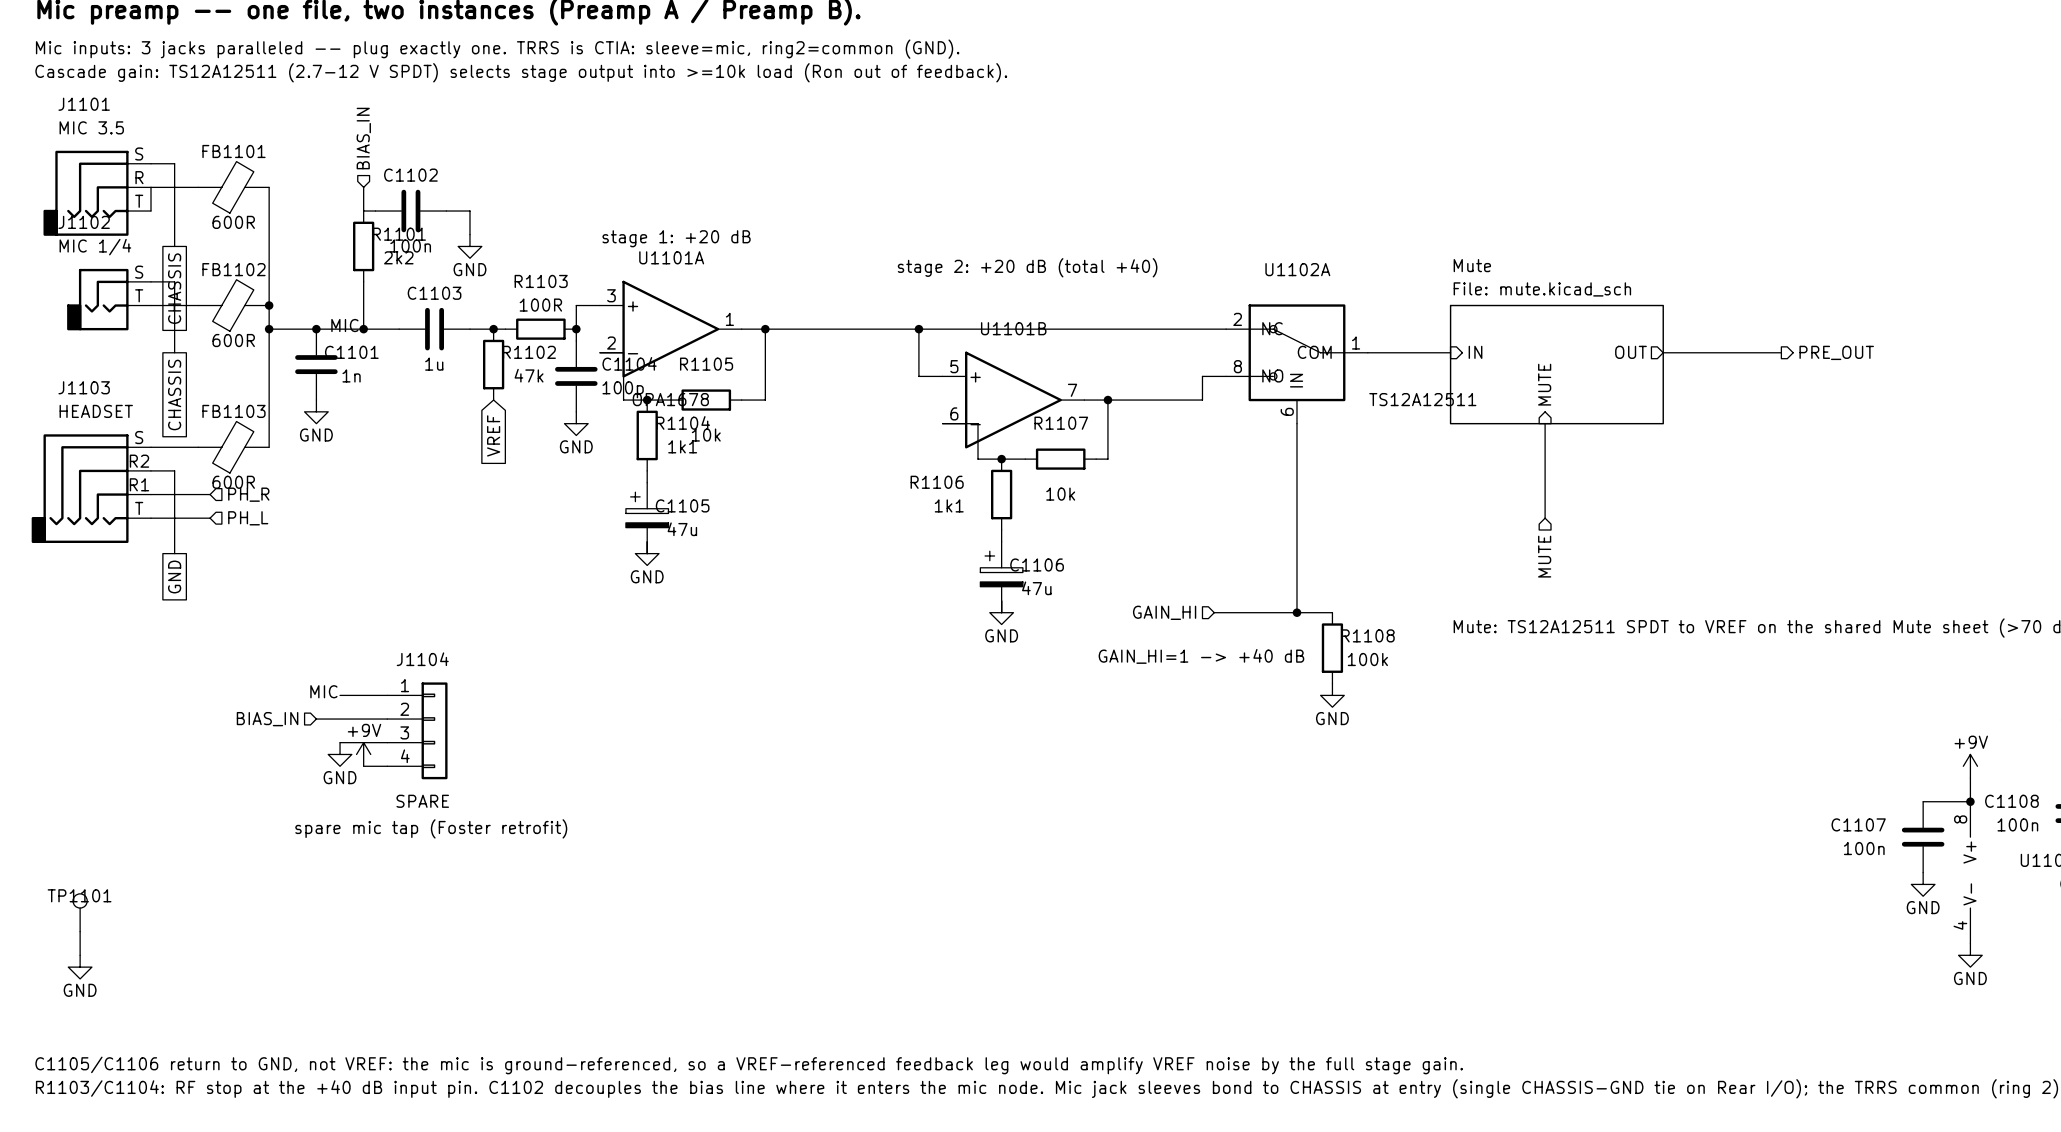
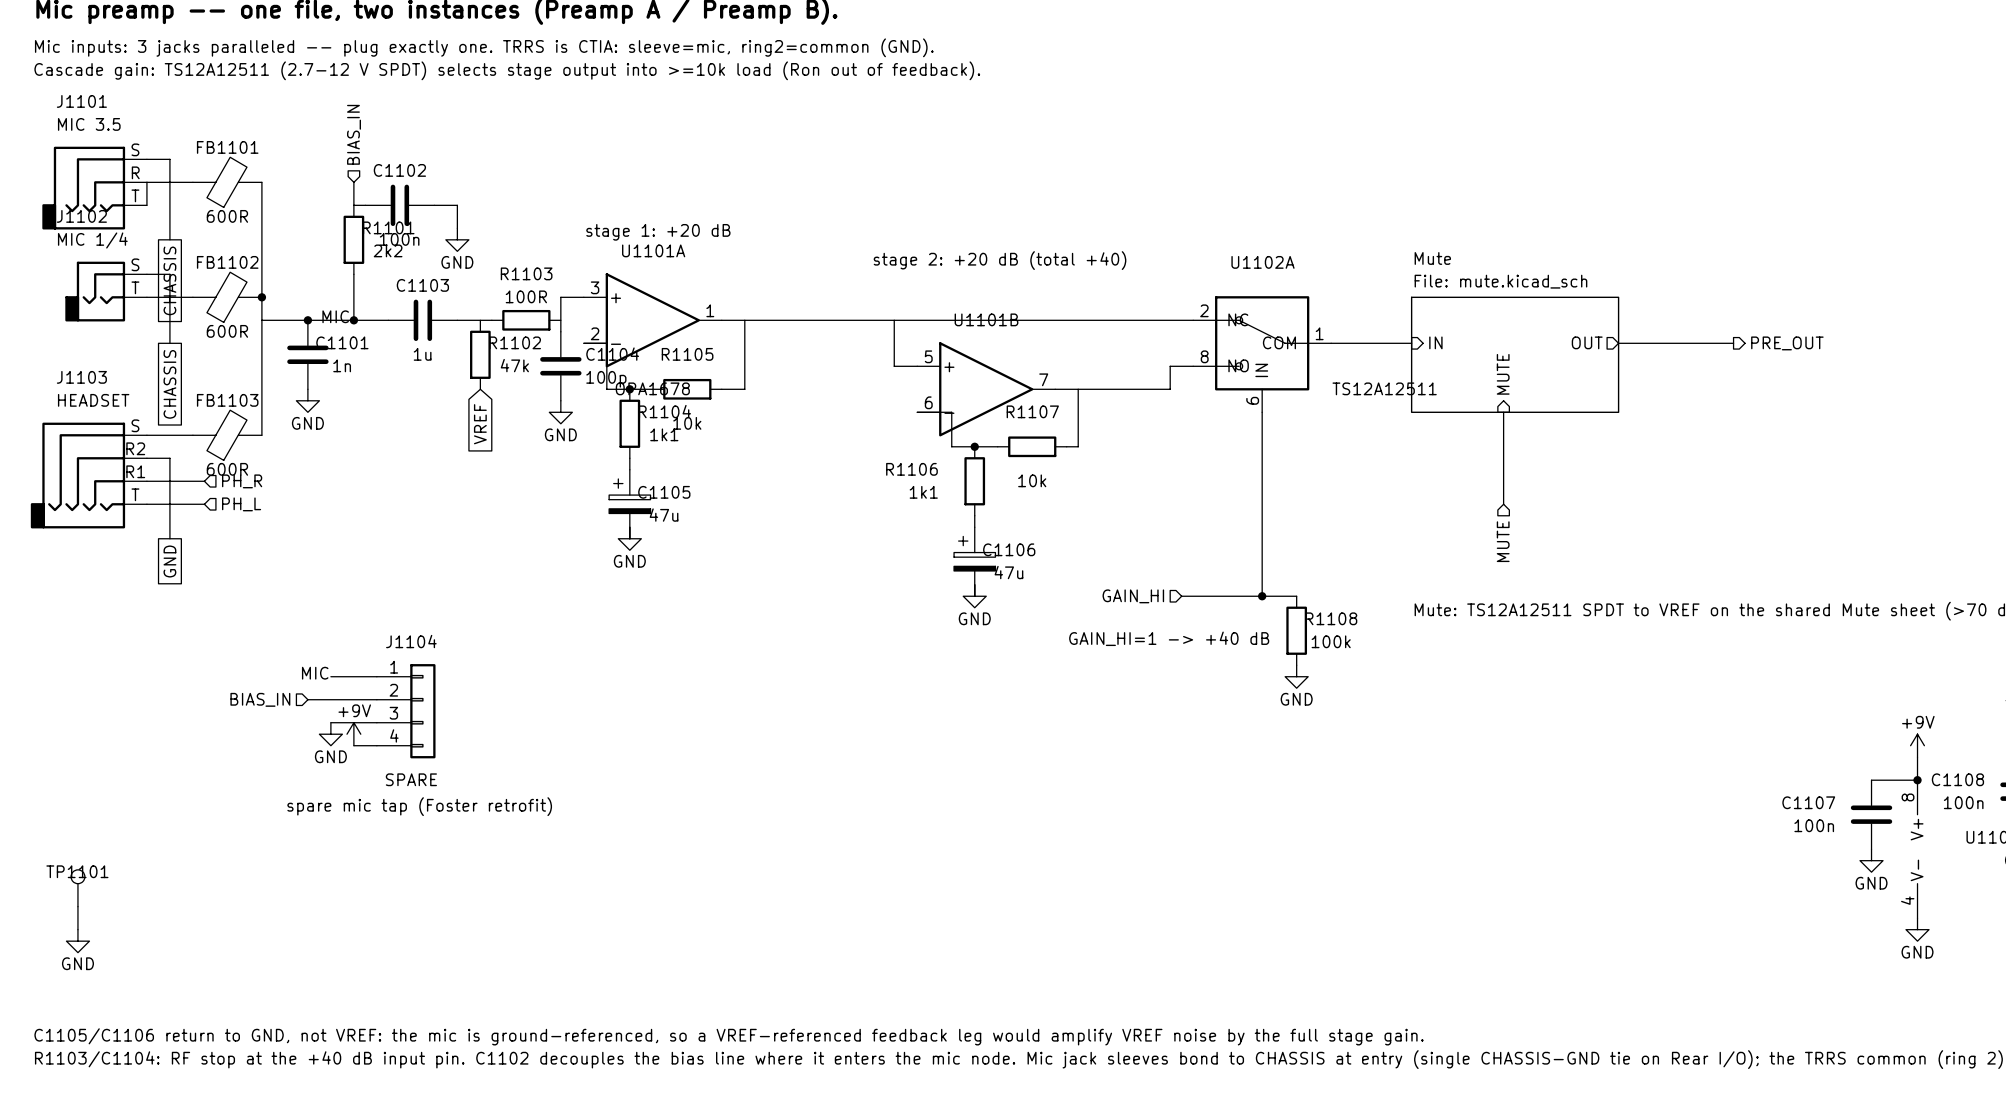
junction: (269, 329) -> none
junction: (493, 329) -> none
junction: (576, 329) -> none
junction: (765, 329) -> none
junction: (918, 329) -> none
junction: (1107, 400) -> none

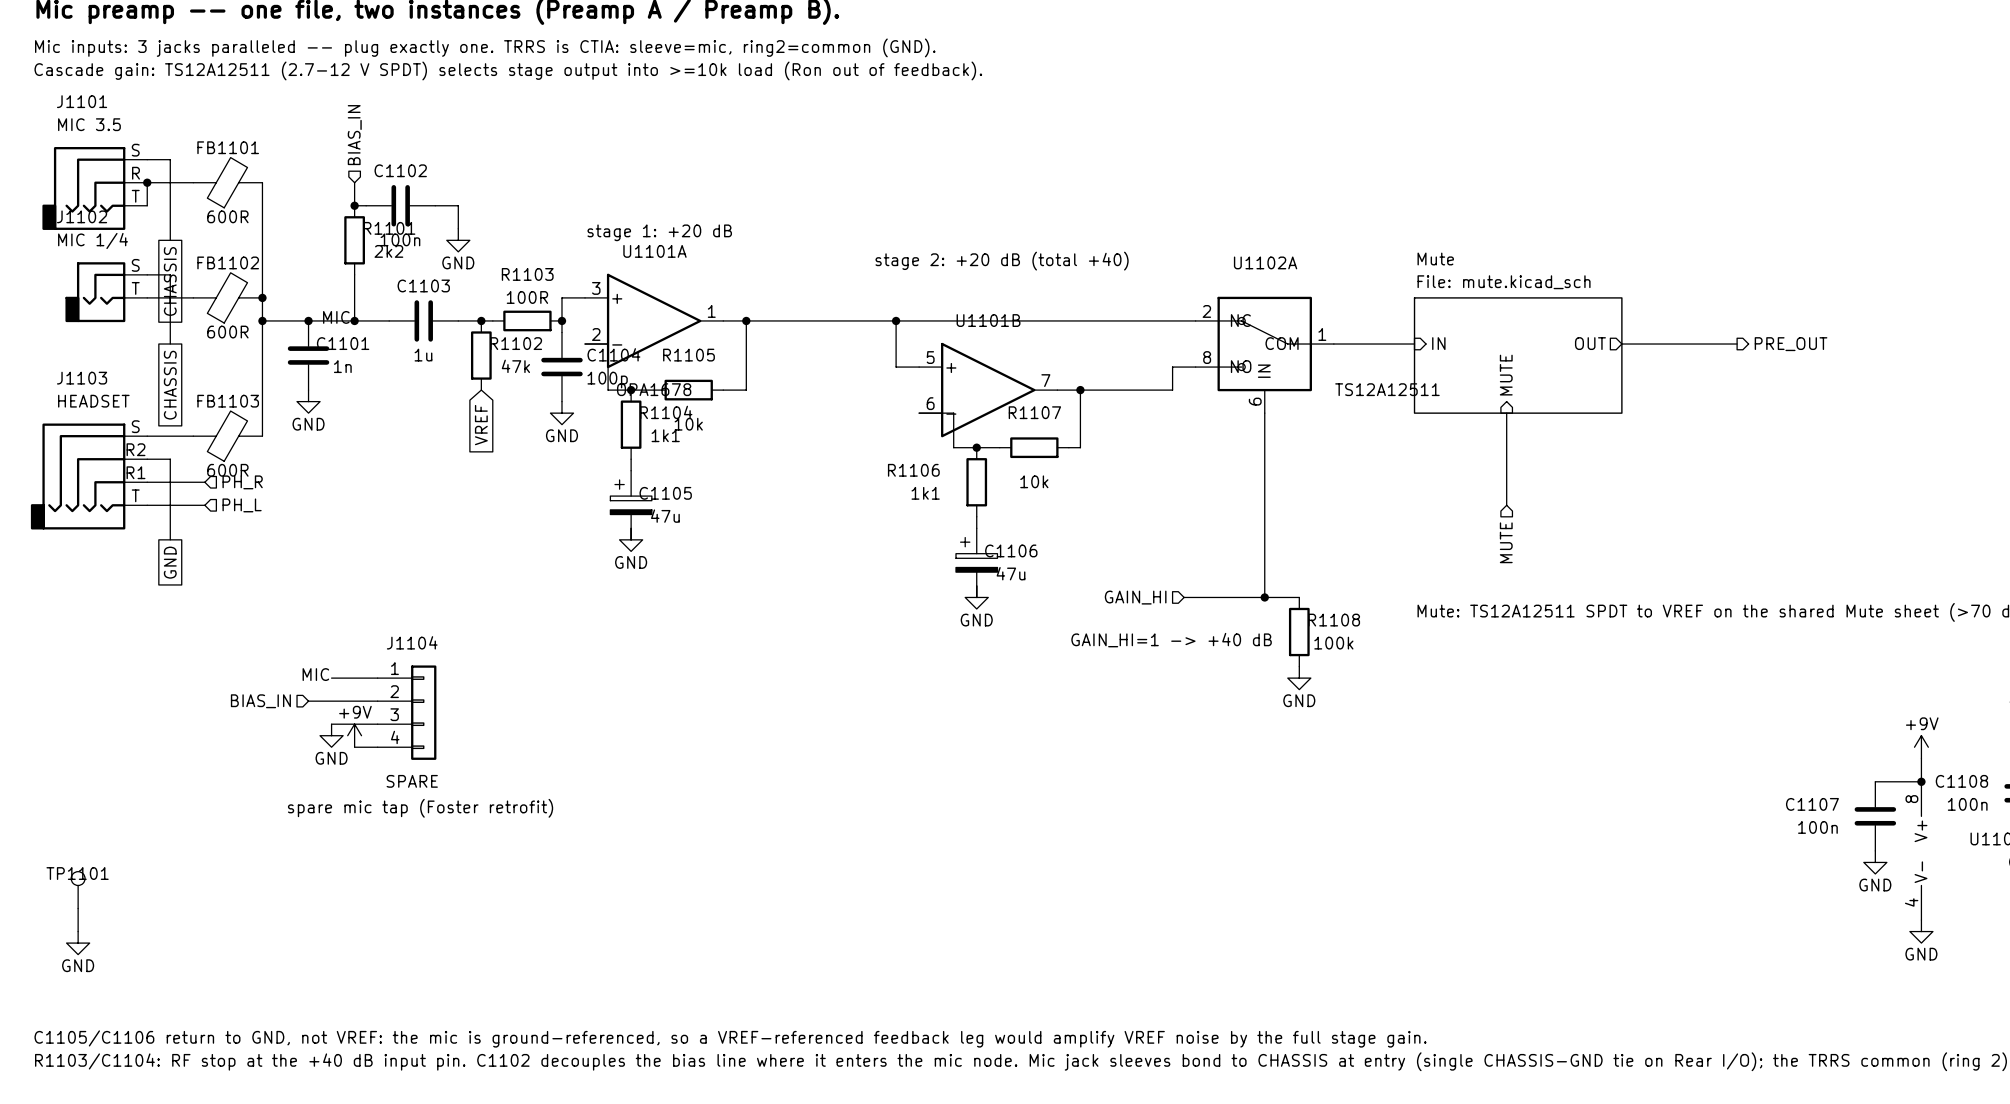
junction: none -> (147, 182)
junction: none -> (354, 205)
junction: none -> (262, 320)
junction: none -> (481, 320)
junction: none -> (561, 320)
junction: none -> (746, 320)
junction: none -> (896, 320)
junction: none -> (1080, 390)

